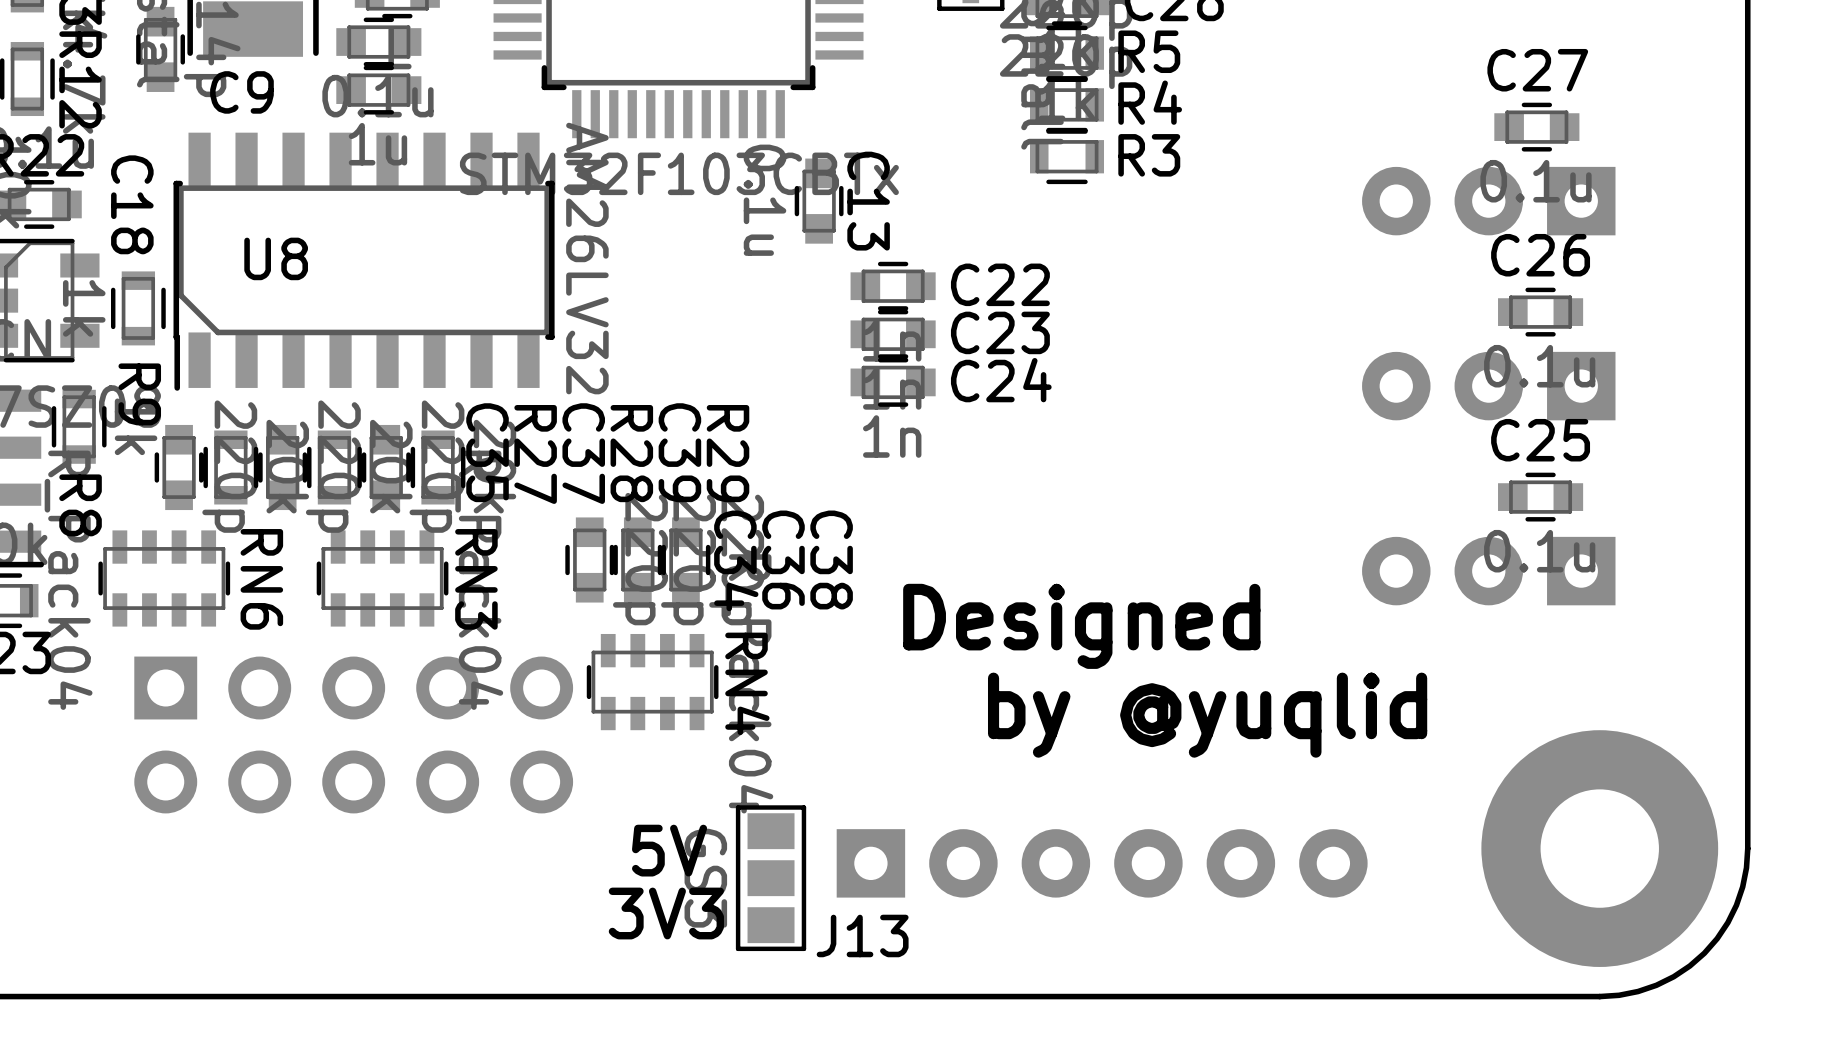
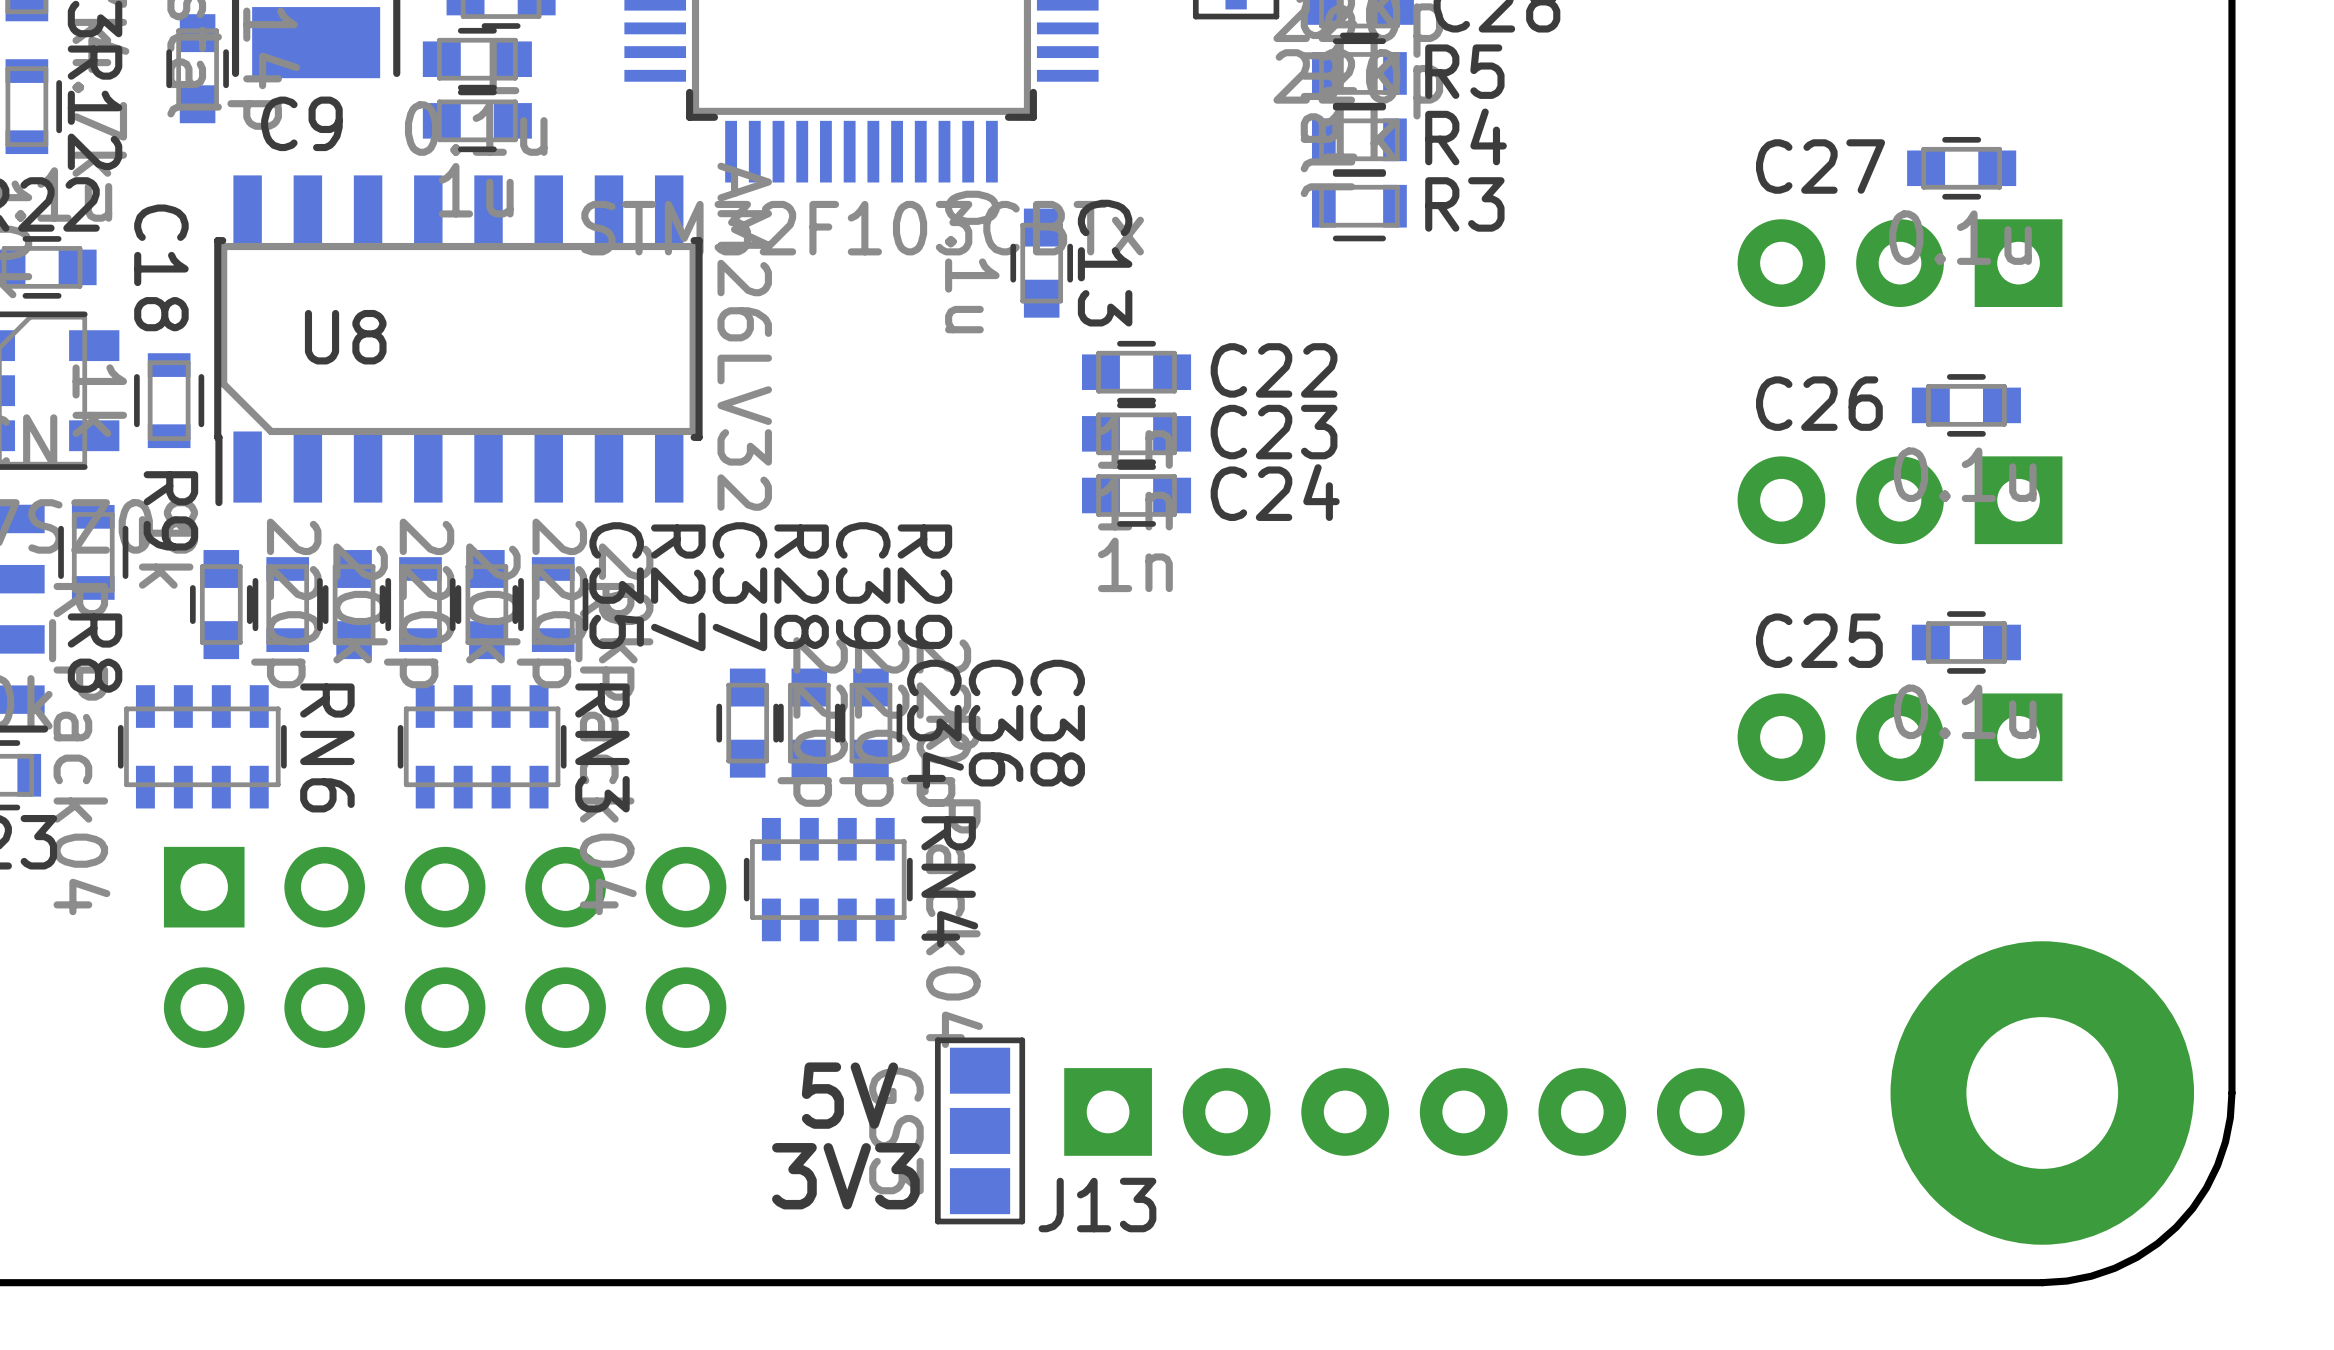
C27 name position: C27 (1537, 70) -> C27 (1820, 166)
C26 name position: C26 (1540, 255) -> C26 (1819, 403)
C25 name position: C25 (1540, 440) -> C25 (1819, 640)
text: Designed (1081, 626) -> none
text: by @yuqlid (1207, 715) -> none

